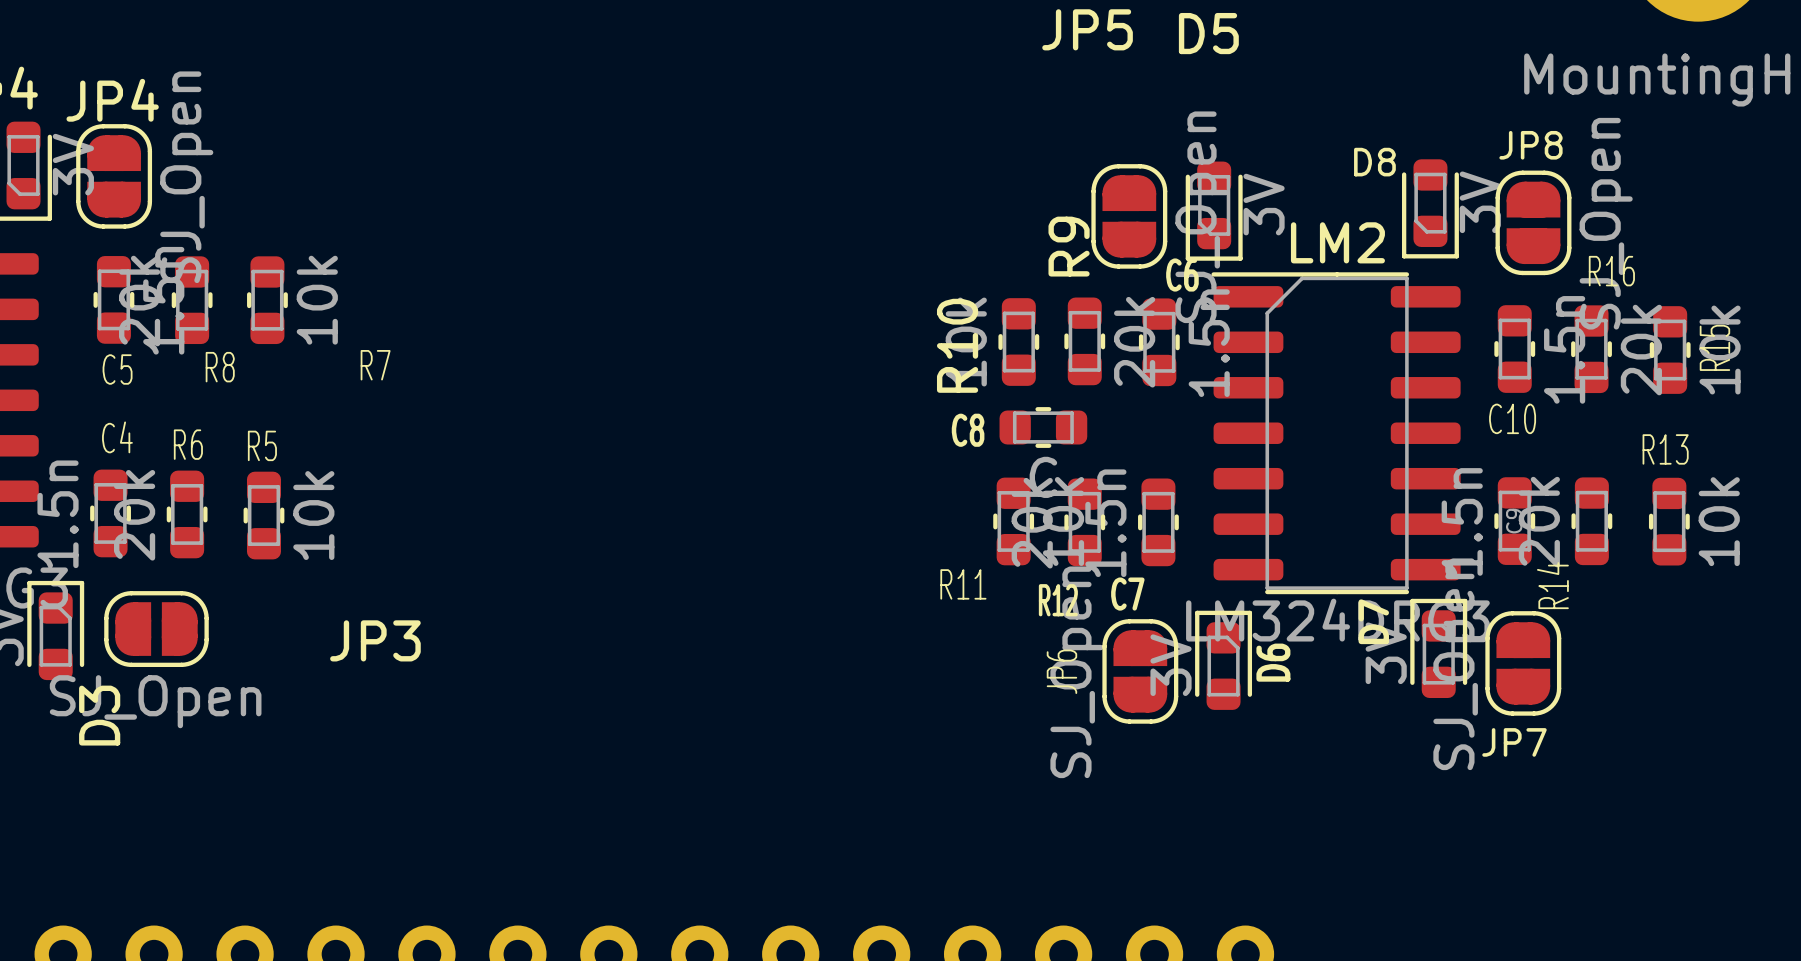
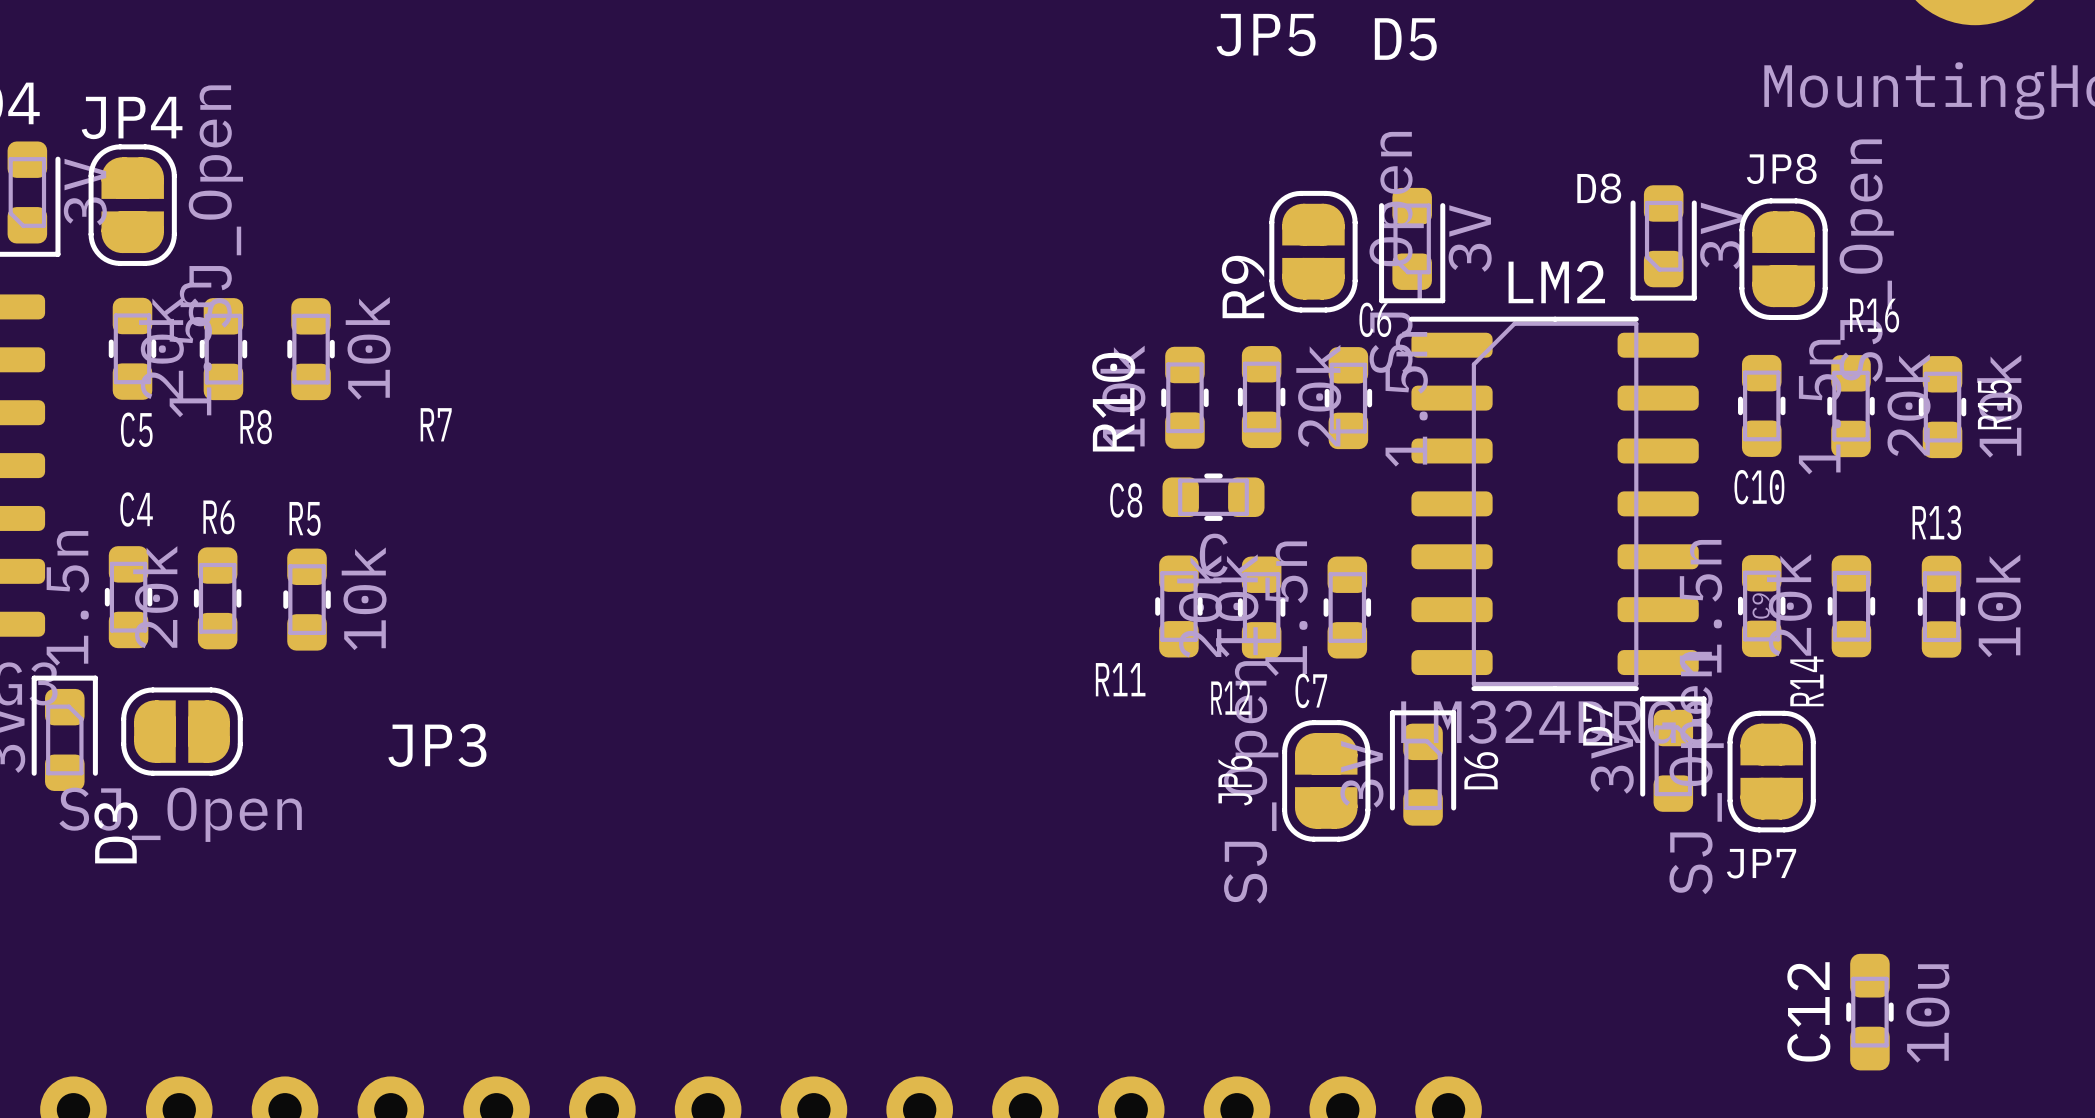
C12: none -> 10u (1869, 1012)

